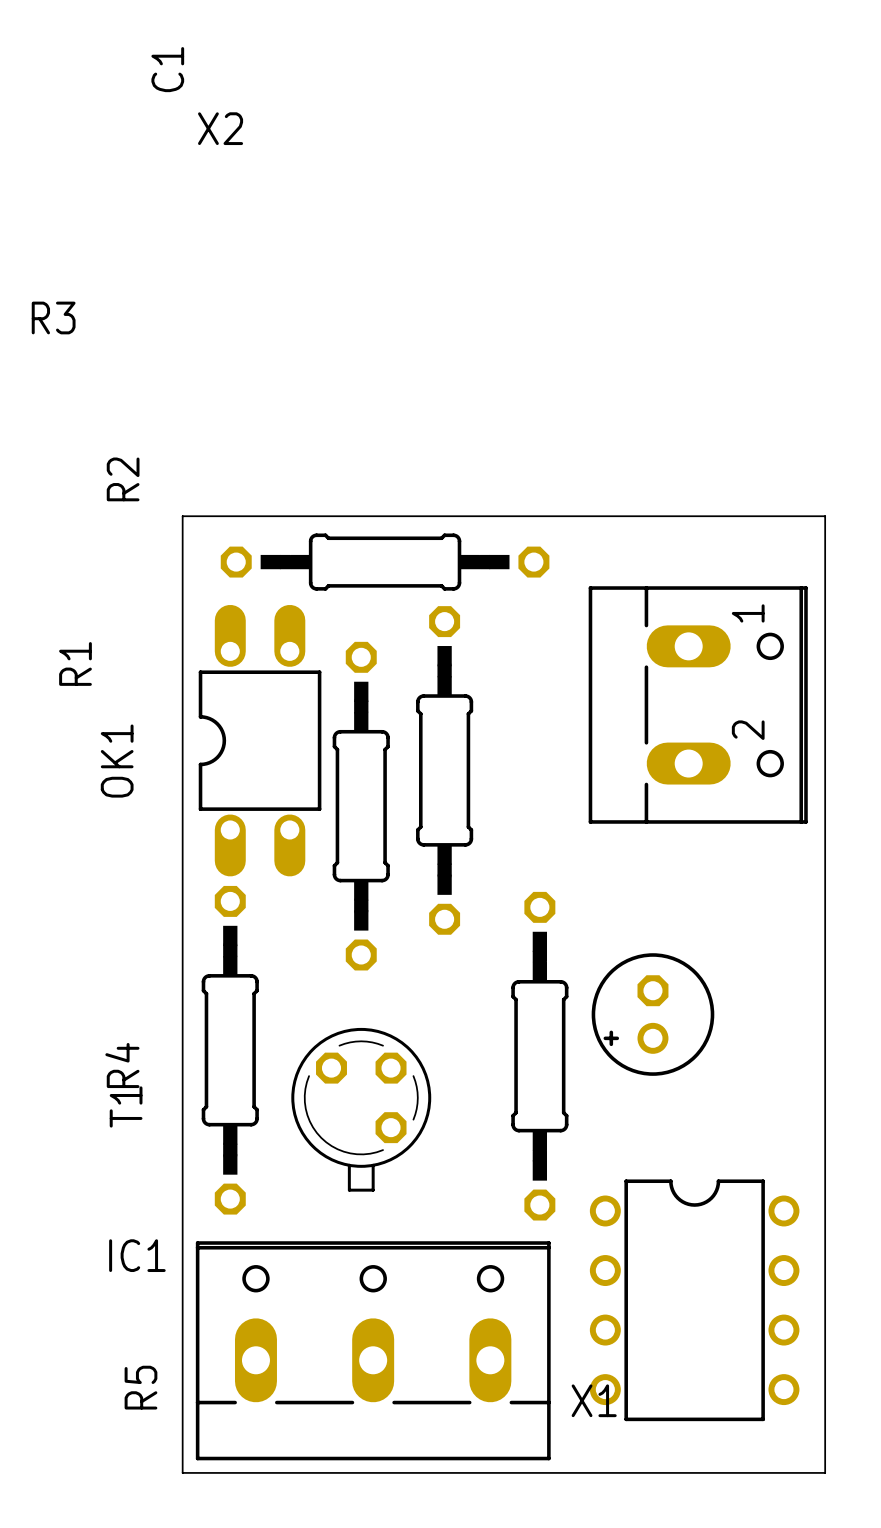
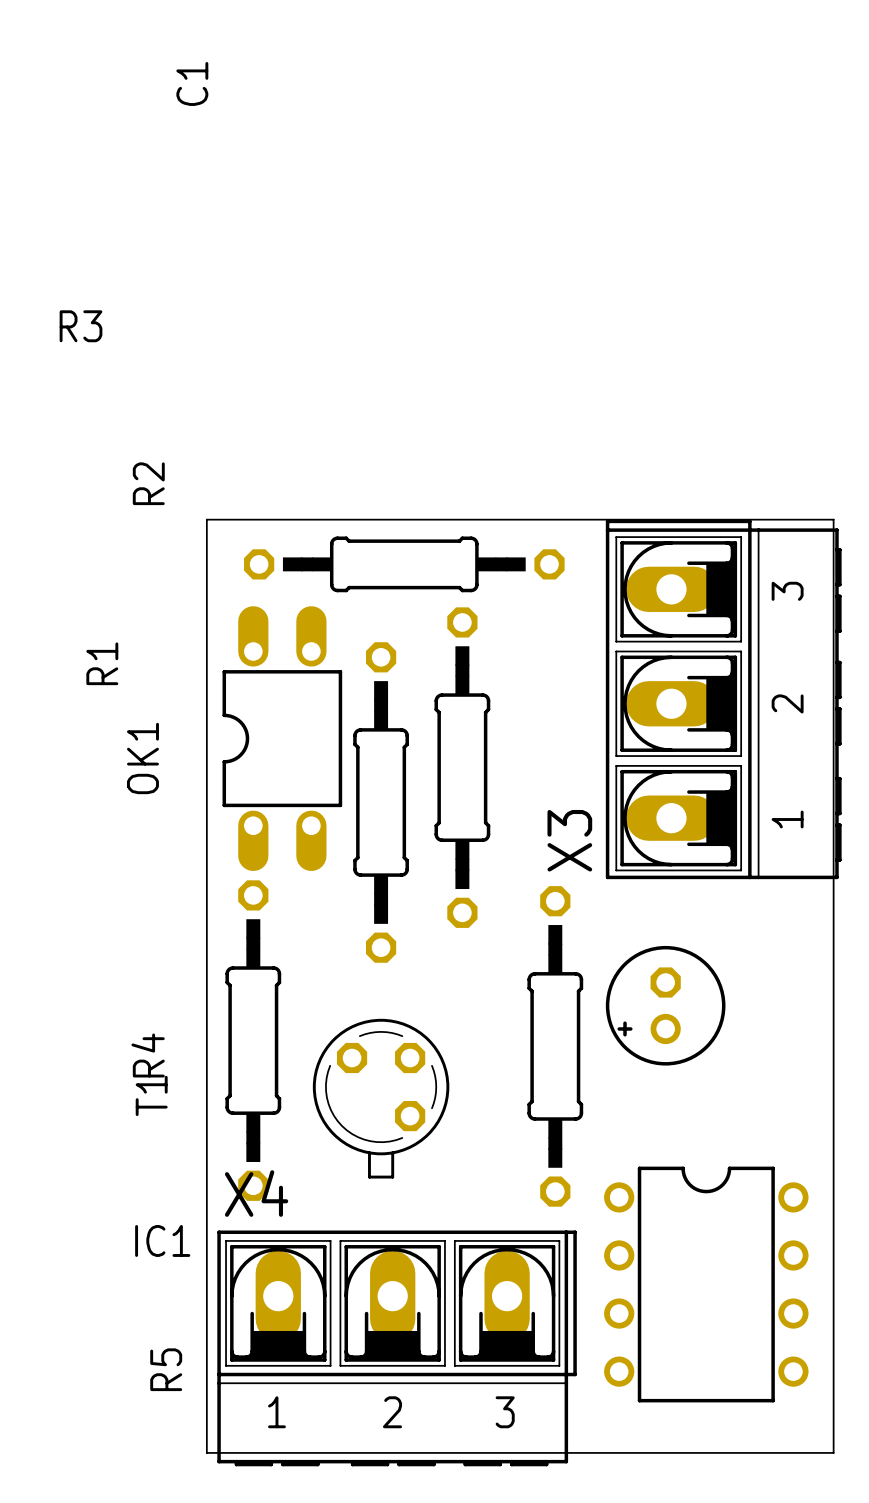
X3: none -> (723, 699)
X2: (698, 705) -> none
X1: (373, 1350) -> none
X4: none -> (397, 1348)

